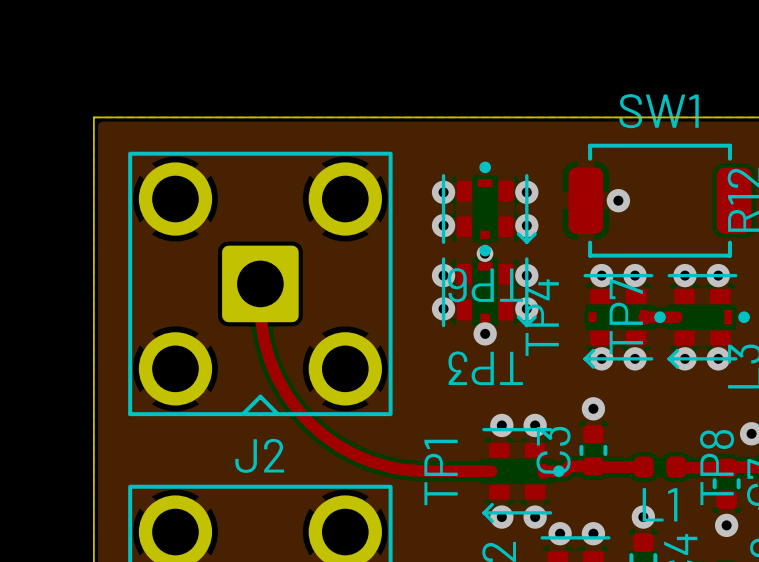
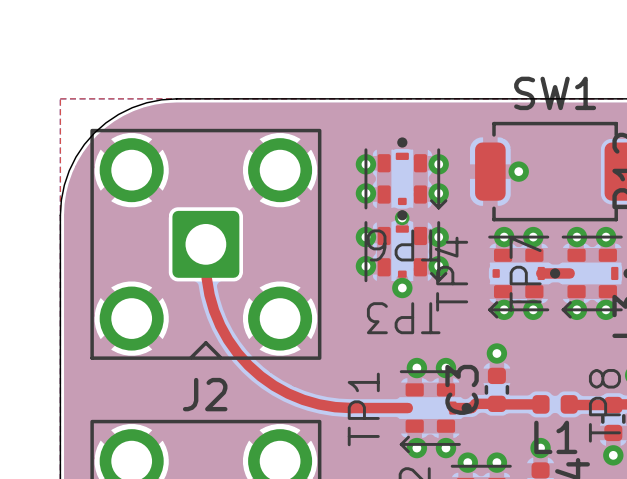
board edge: (227, 117) (93, 117) (93, 250) -> (176, 98) (146, 102) (132, 107) (118, 114) (94, 132) (75, 157) (69, 170) (61, 200) (60, 215)

